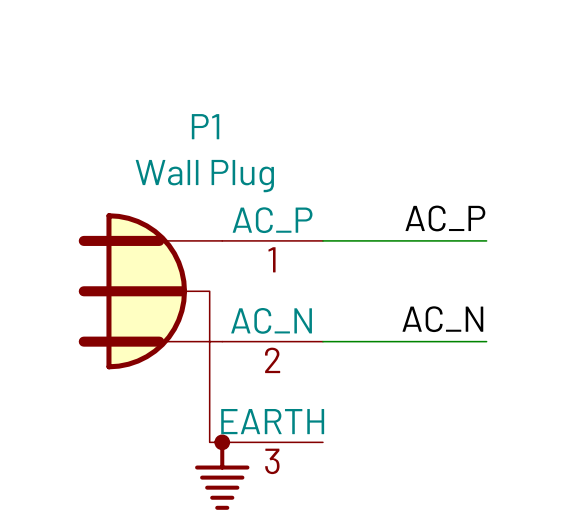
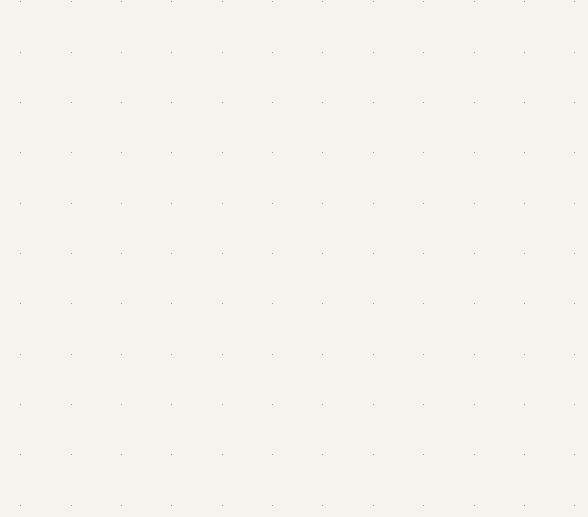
label: AC_P (445, 218) -> none
wire: (322, 240) (486, 240) -> none
label: AC_N (442, 319) -> none
wire: (322, 341) (486, 341) -> none
P1: Wall Plug (200, 361) -> none

